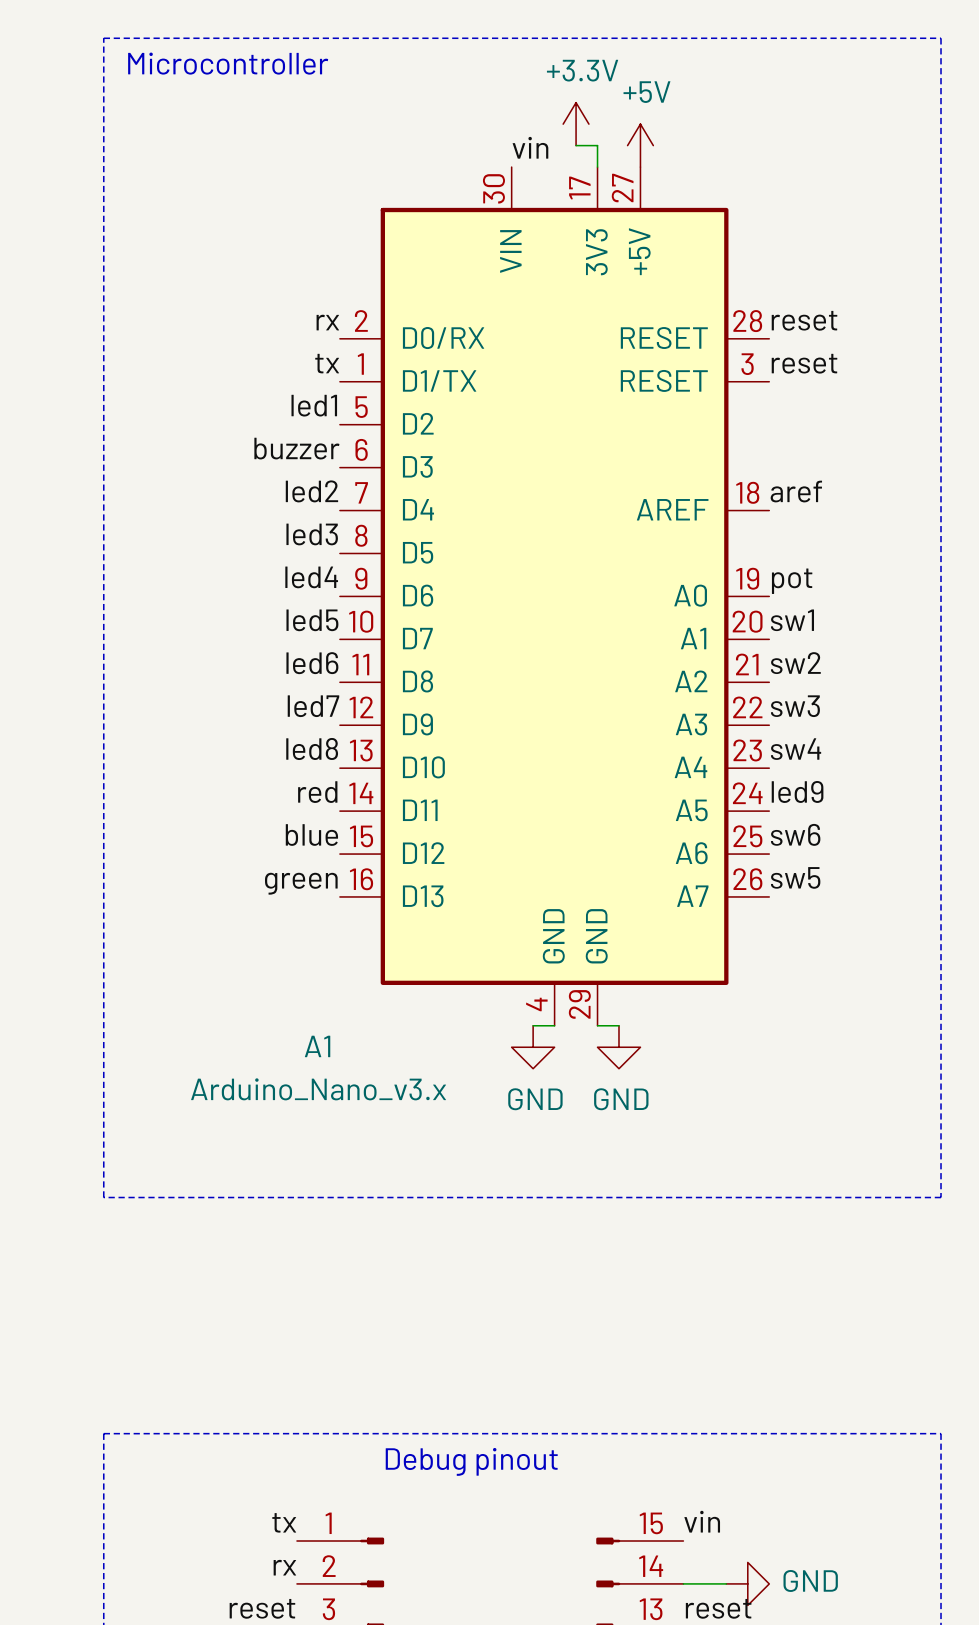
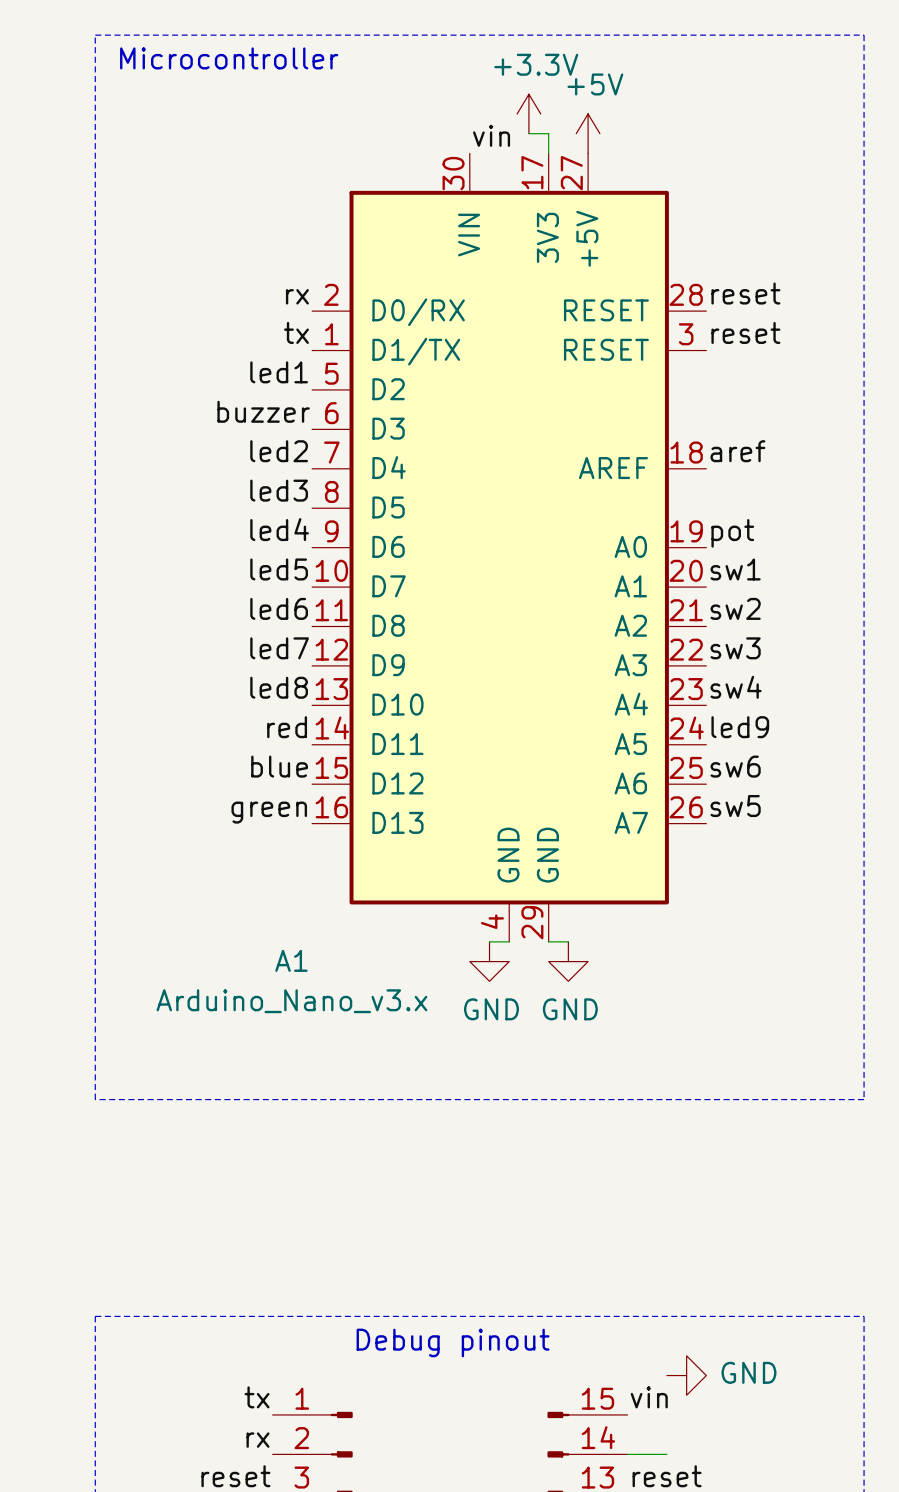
power symbol position: GND (747, 1583) -> GND (686, 1375)

